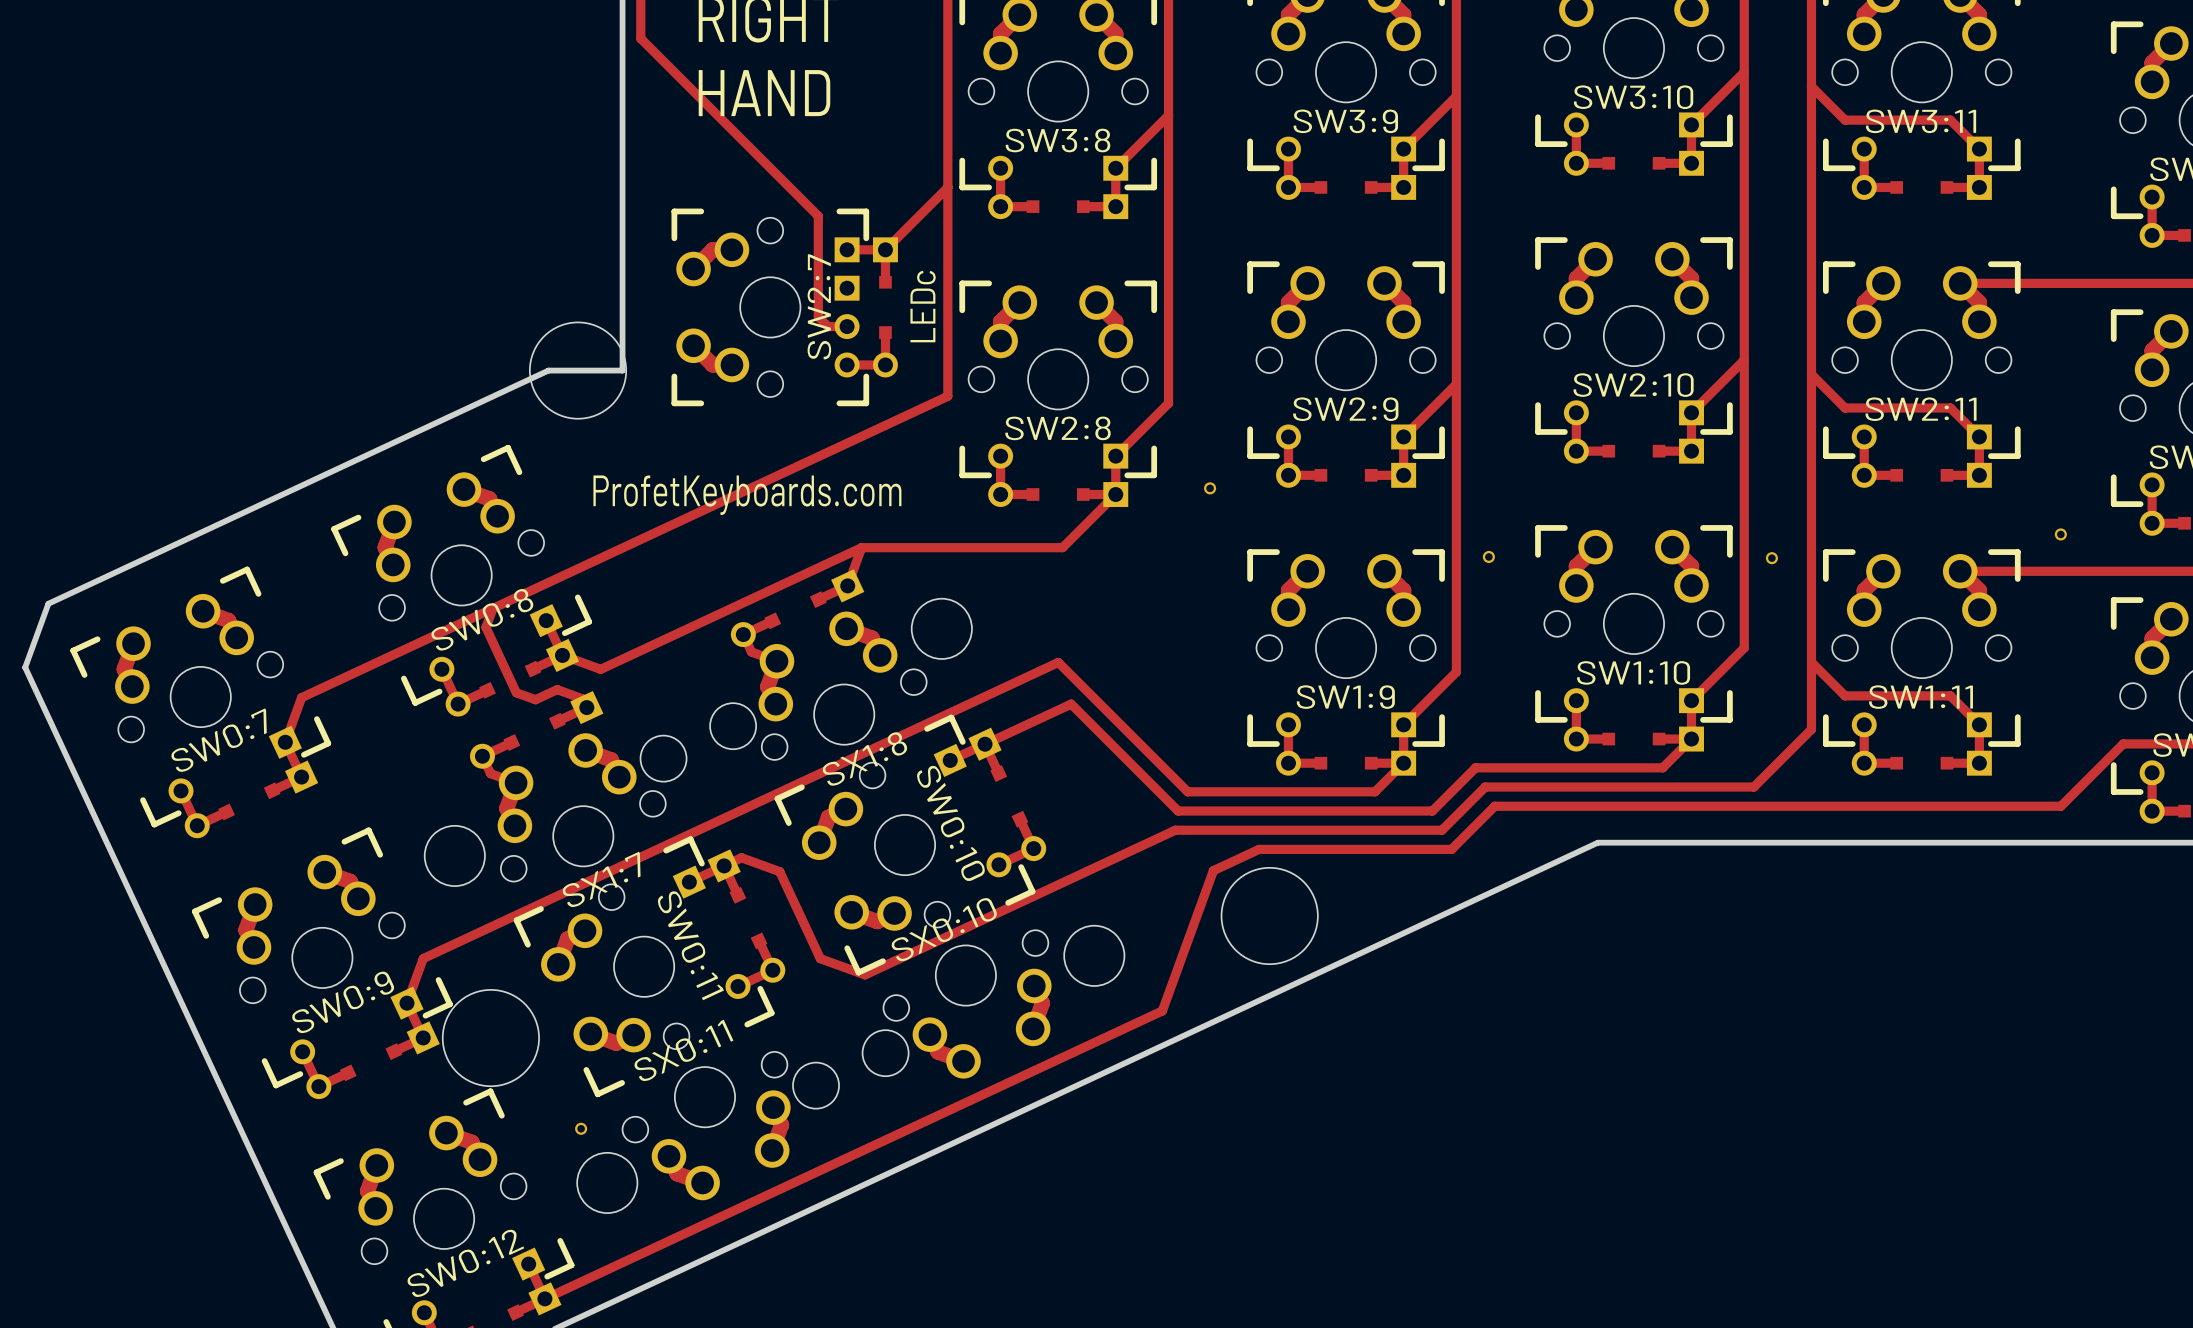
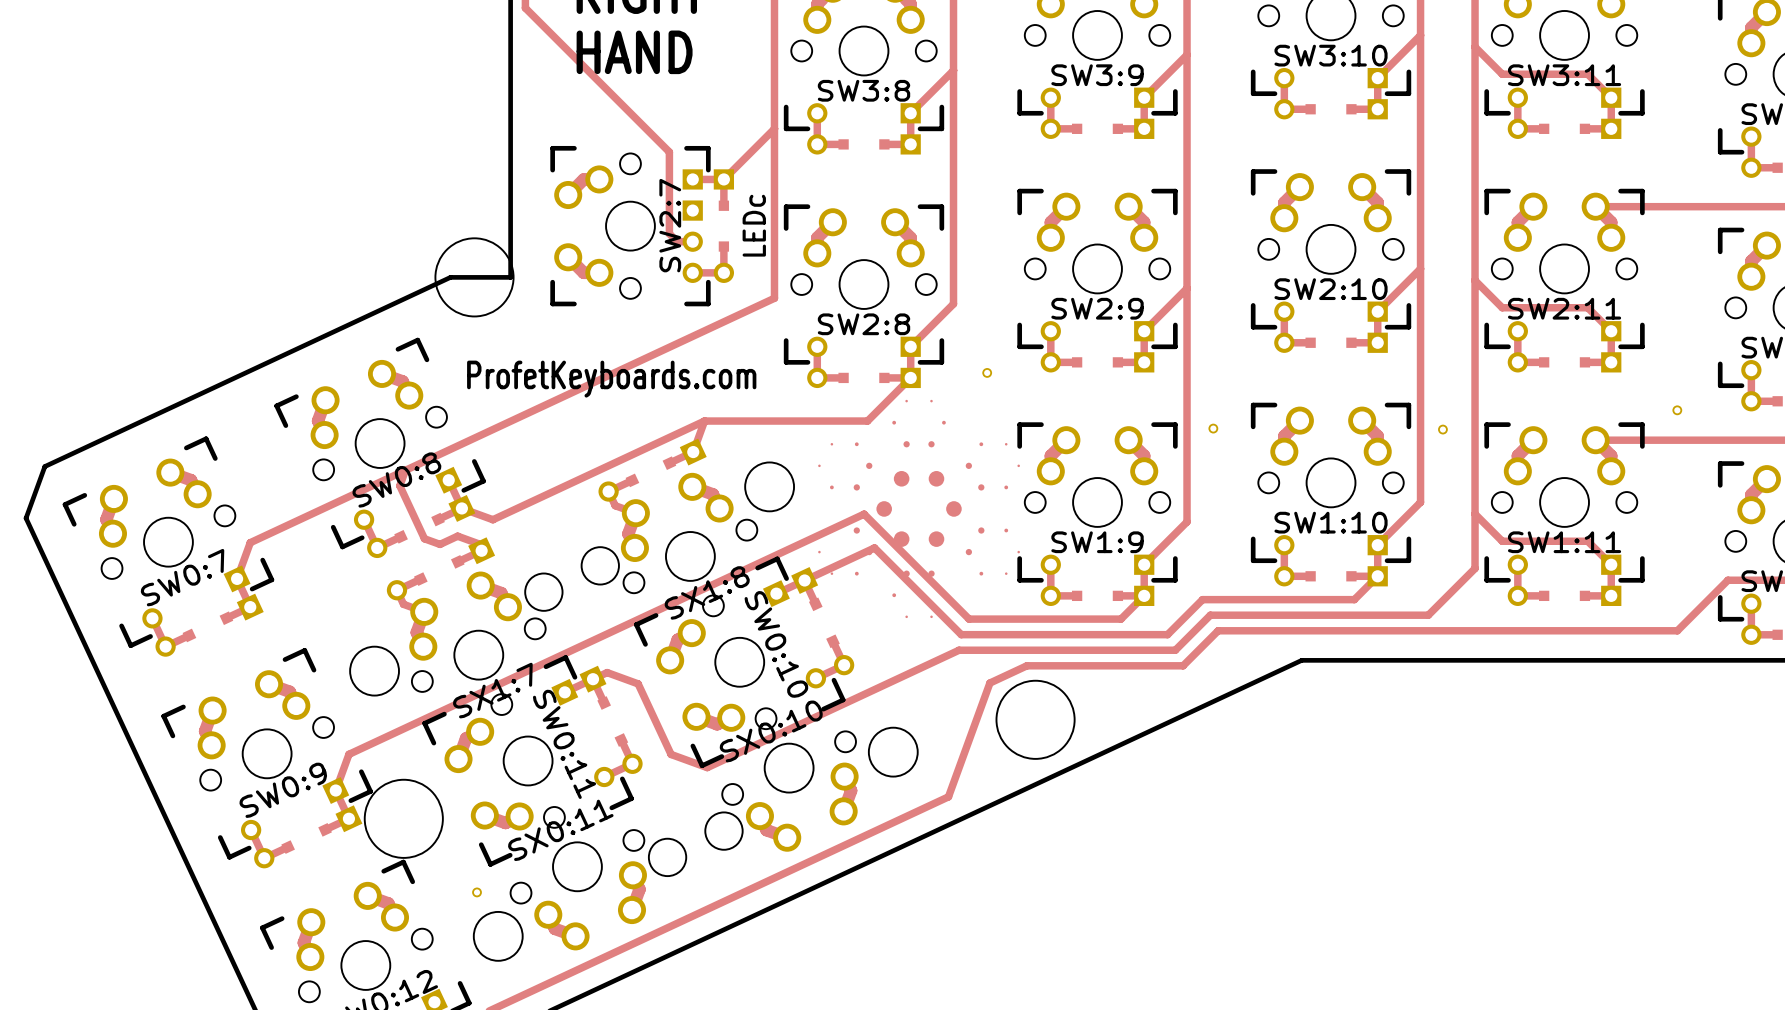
part: none -> (919, 508)

